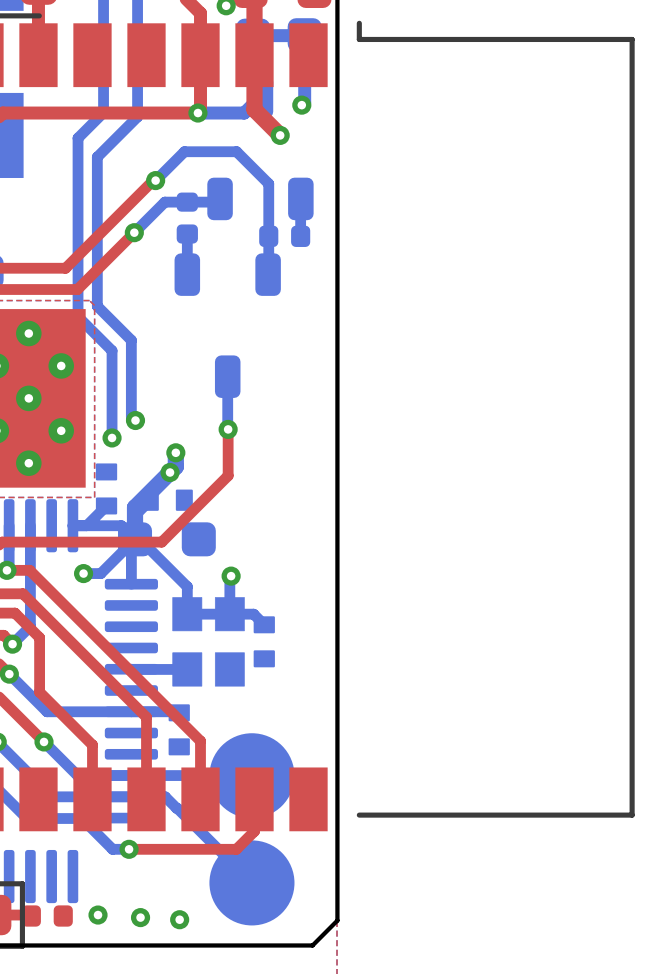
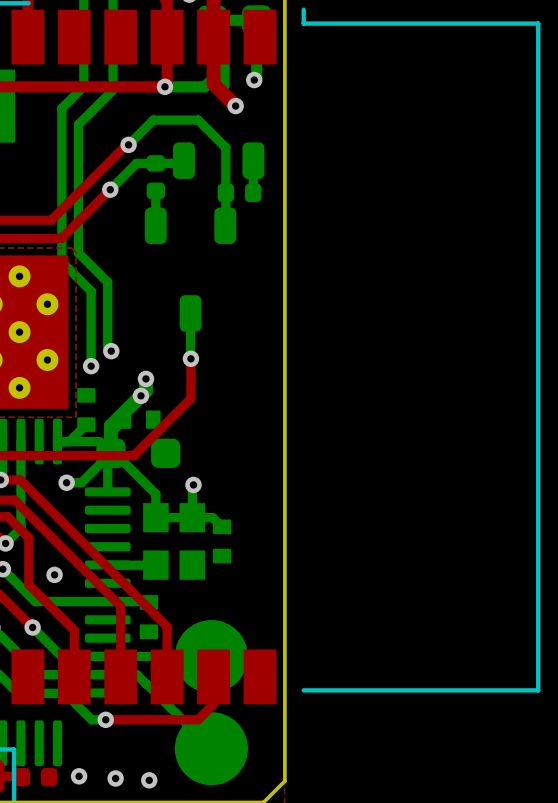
via: none -> (54, 574)

